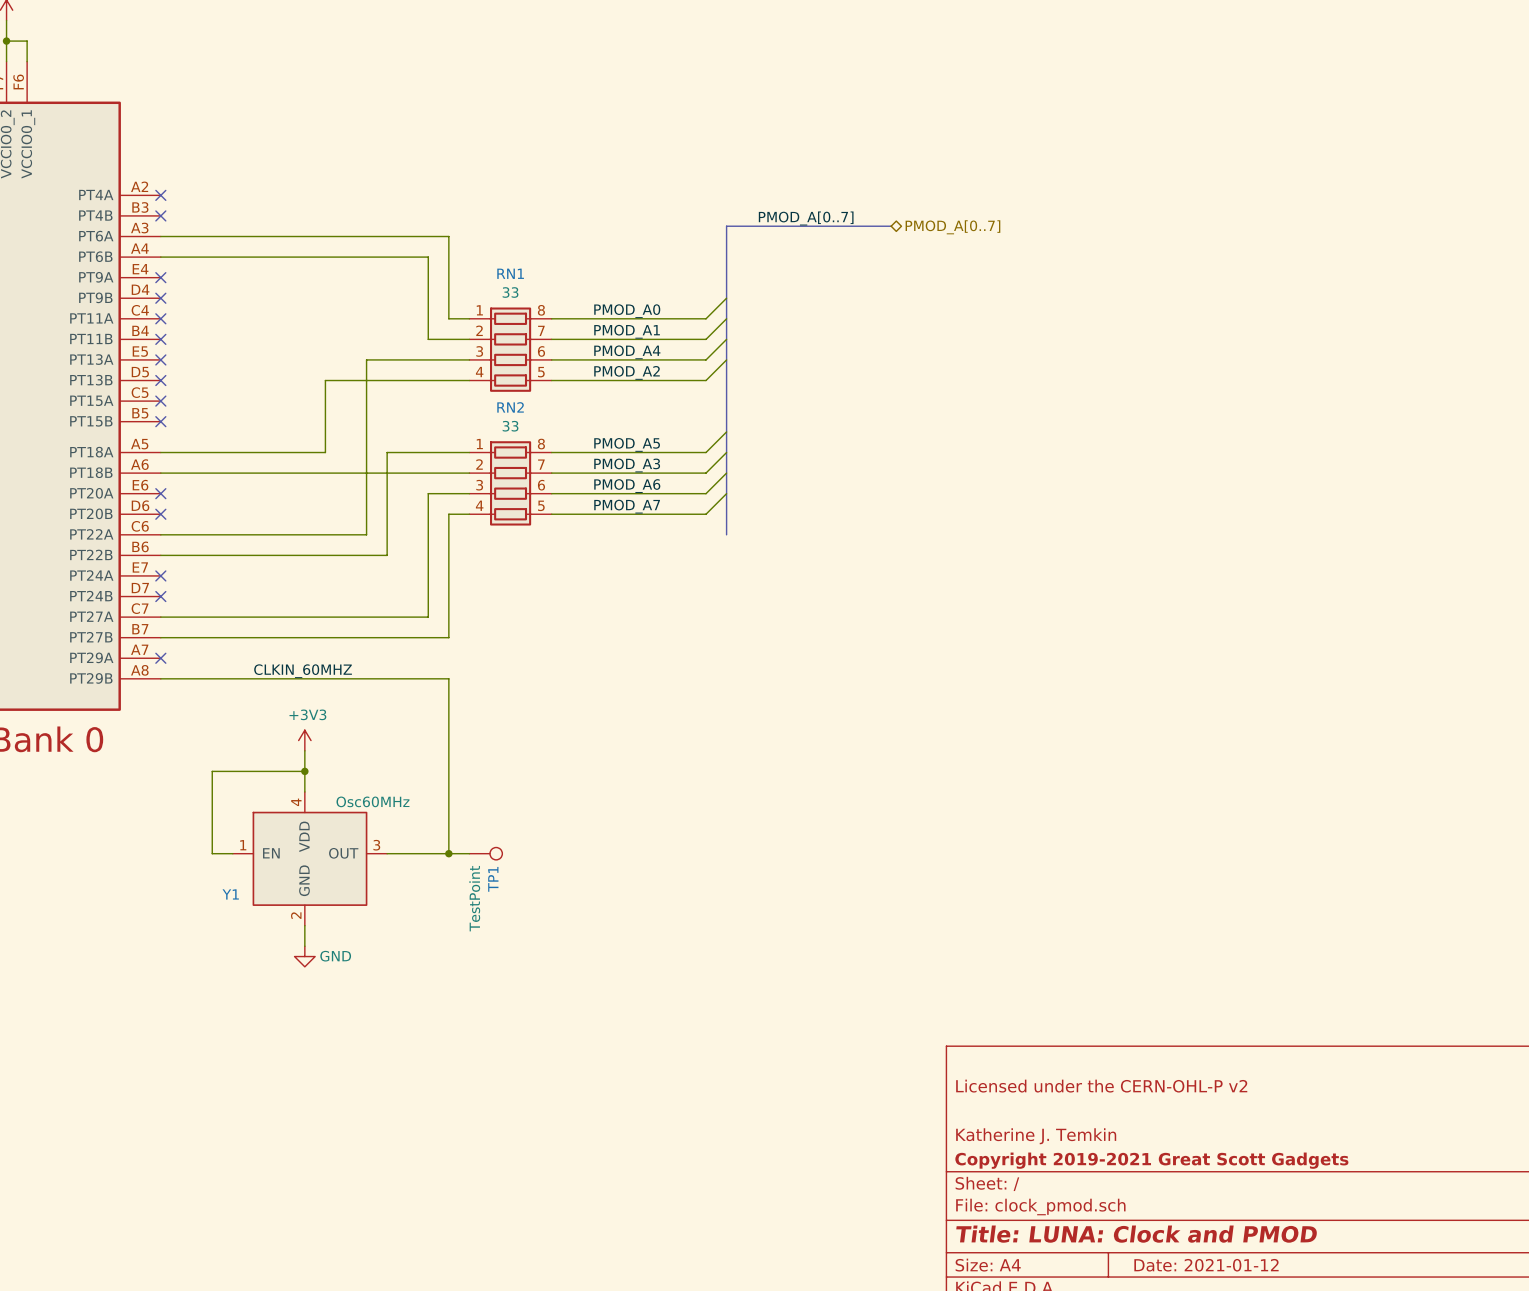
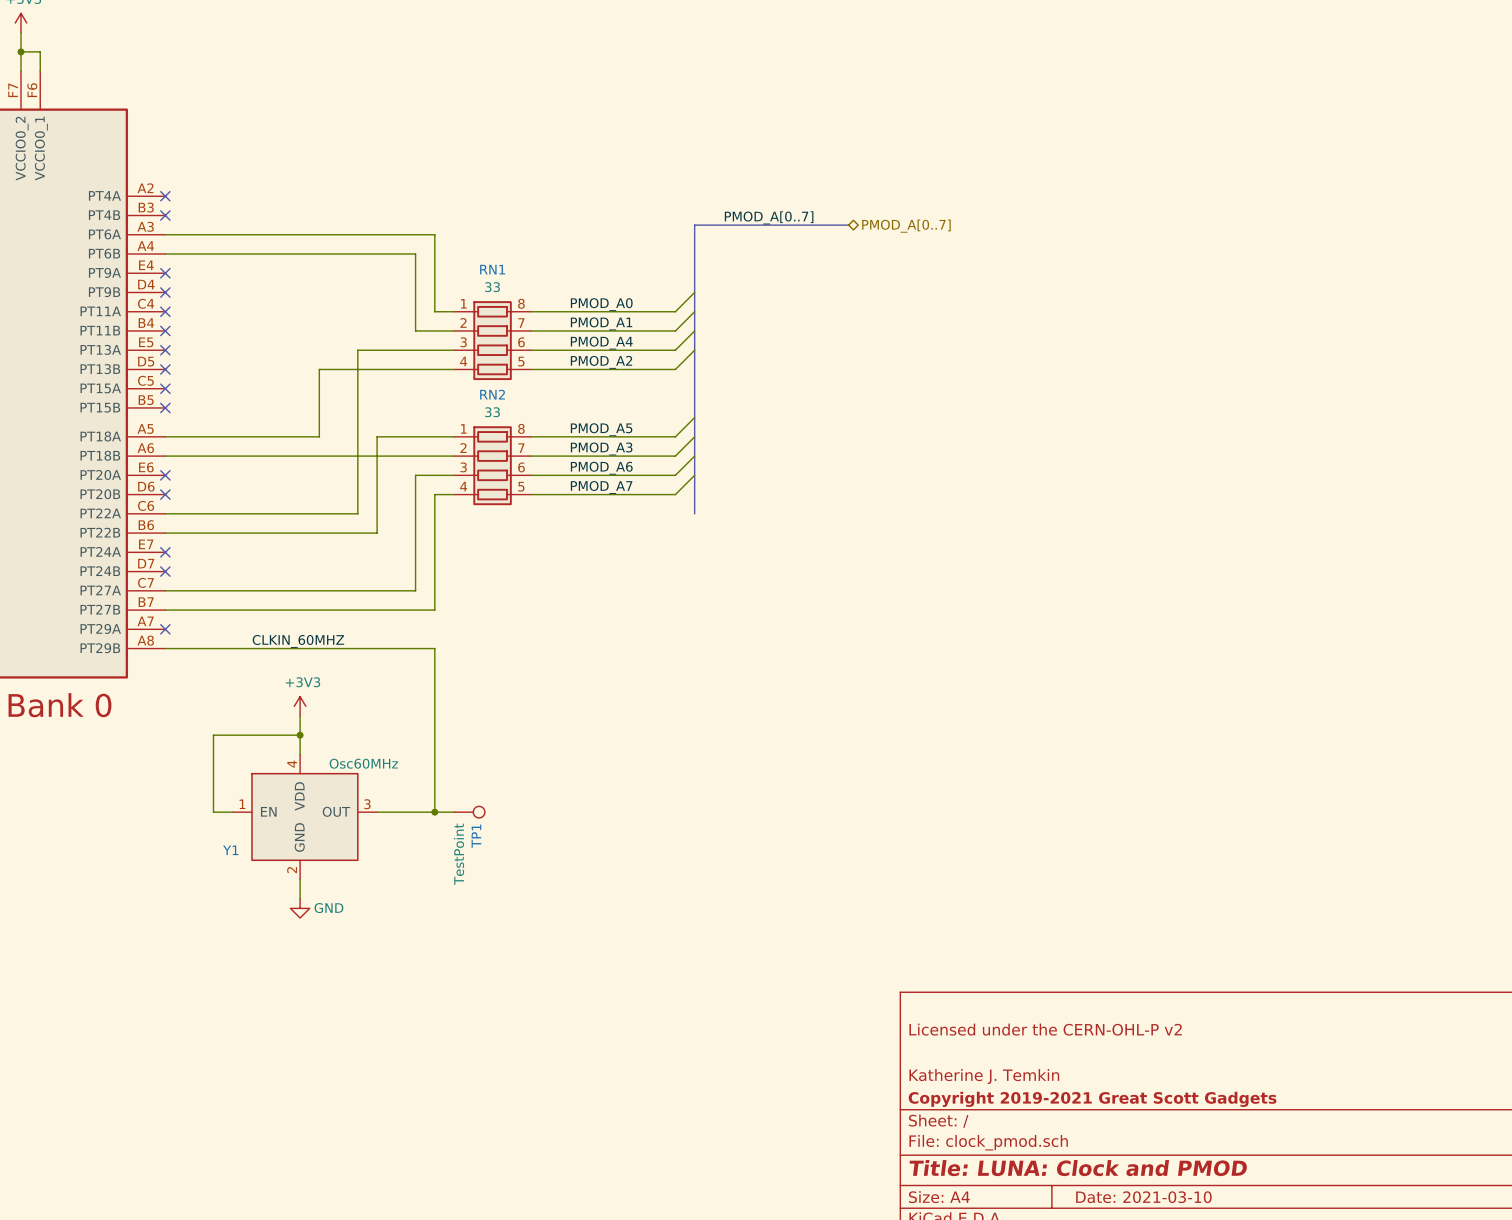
title block: Date: 2021-01-12 (1206, 1265) -> Date: 2021-03-10 (1143, 1197)

